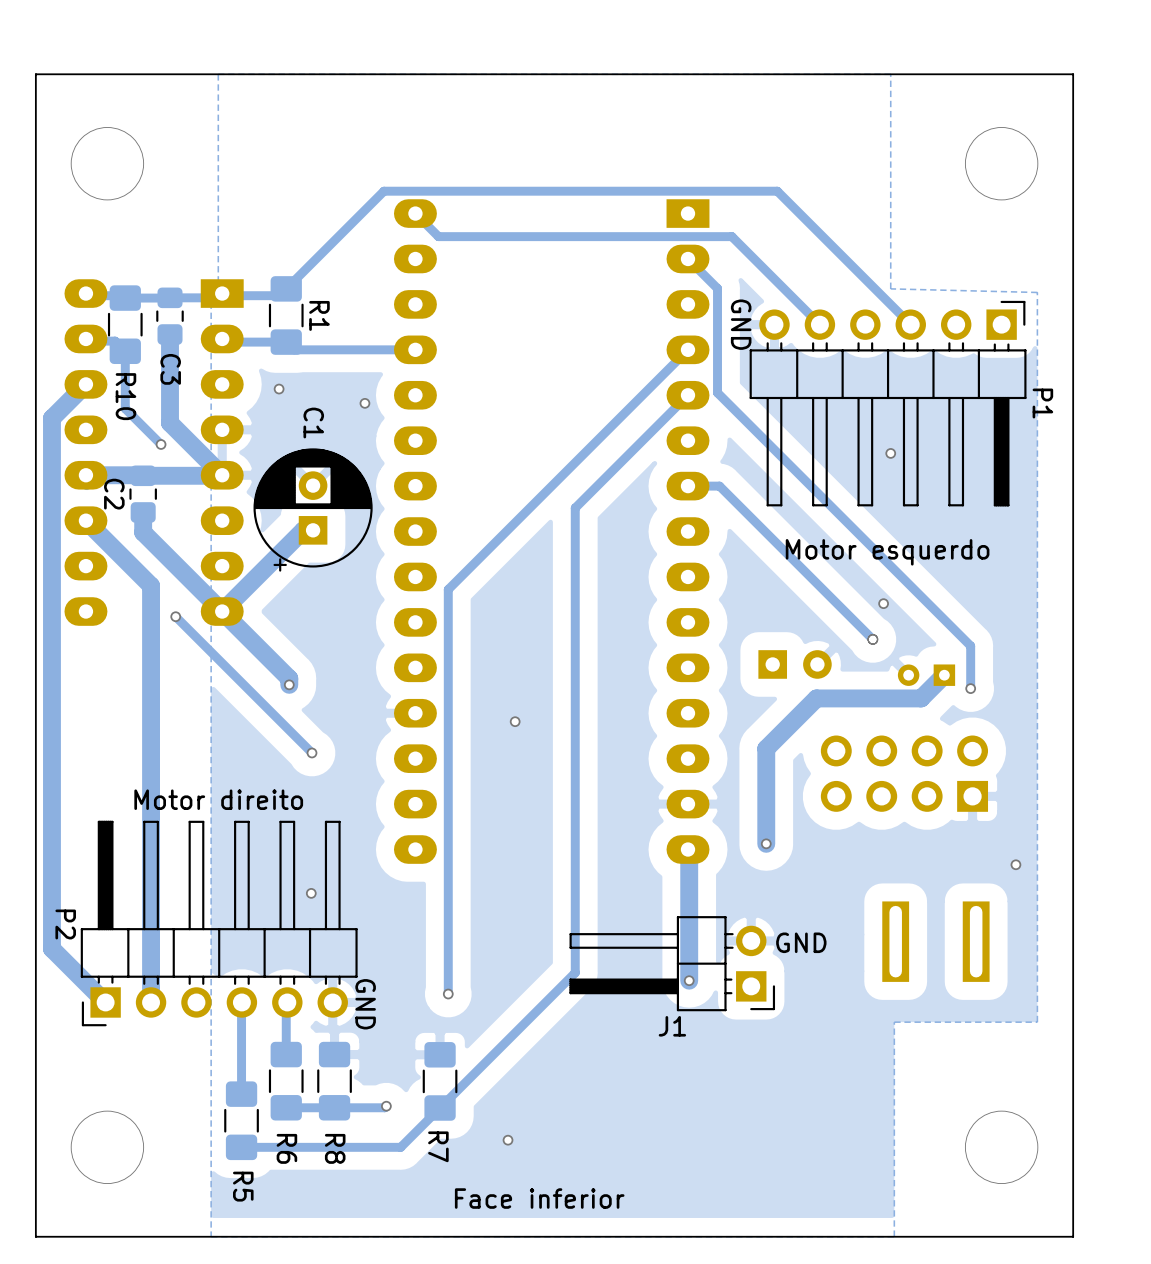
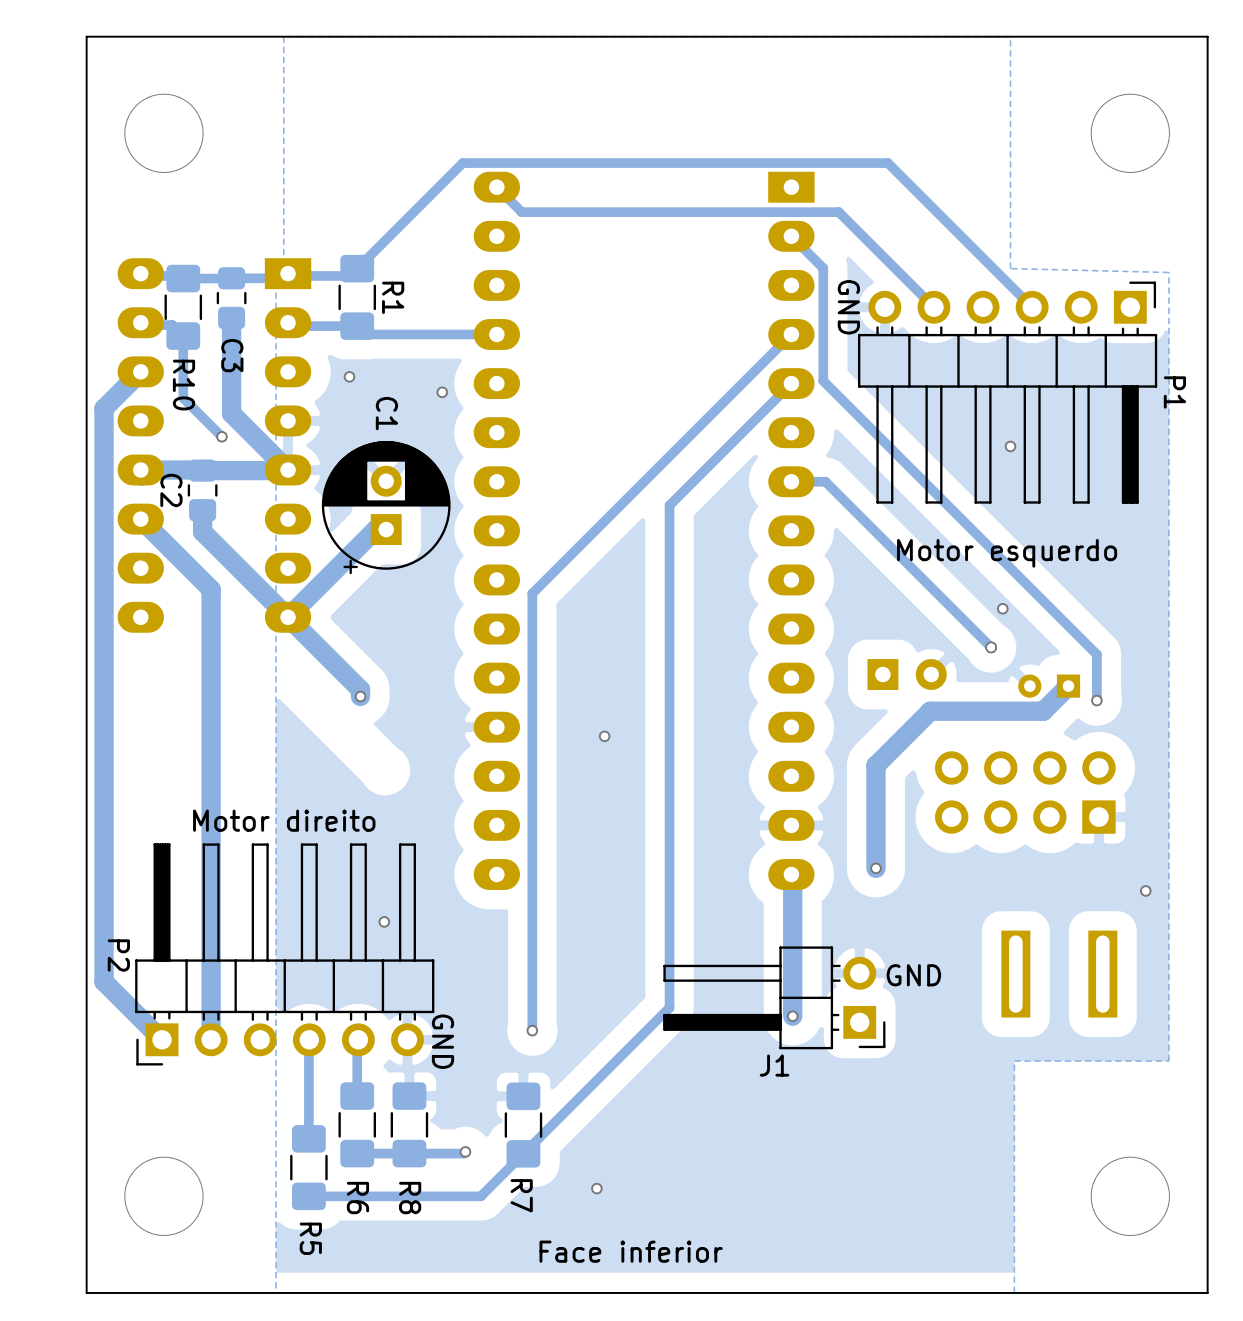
track: (175, 616) (312, 752) -> none
via: (175, 616) -> none
via: (312, 752) -> none

